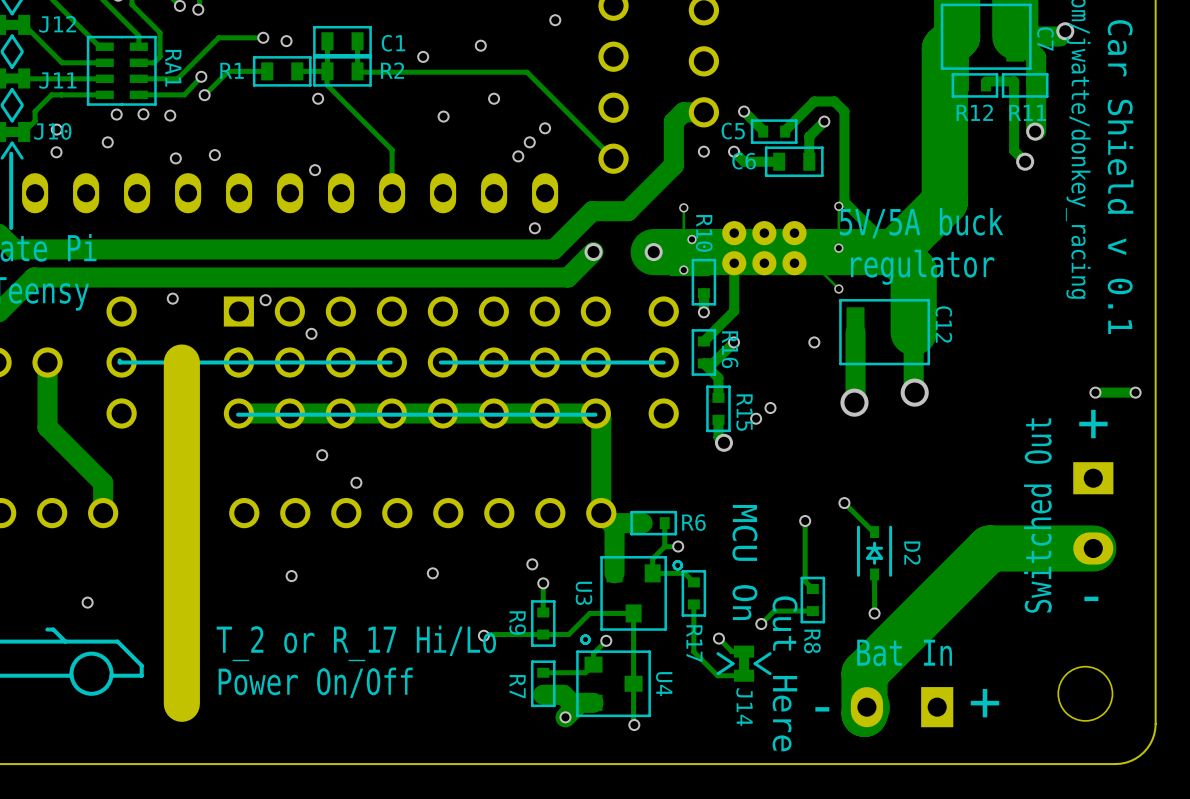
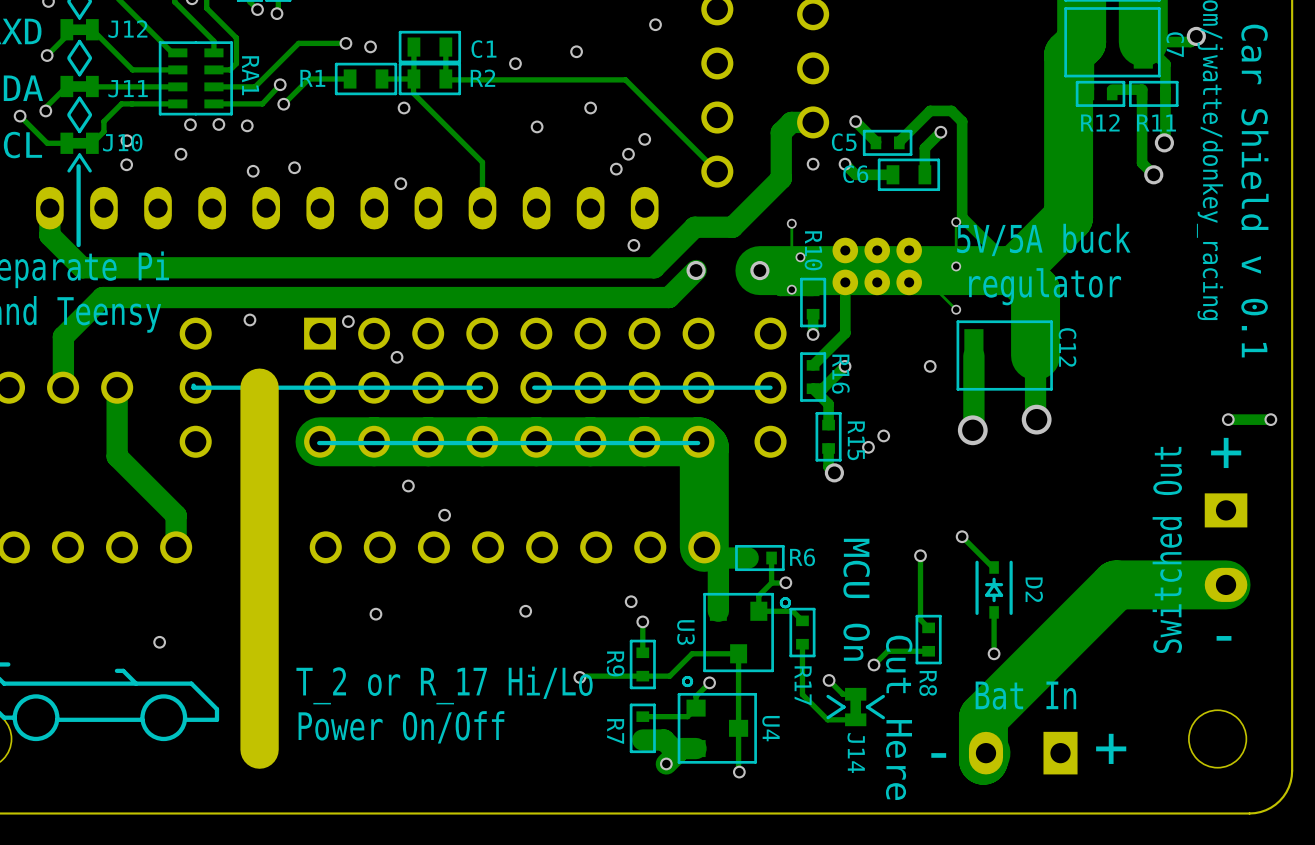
track width: thick (1060, 36) (1015, 36) (1036, 57) (1036, 130) -> thin (1190, 42) (1143, 42) (1165, 64) (1165, 141)
track width: thin (238, 413) (595, 413) (601, 418) (601, 513) -> thick (320, 441) (698, 441) (704, 447) (704, 547)

